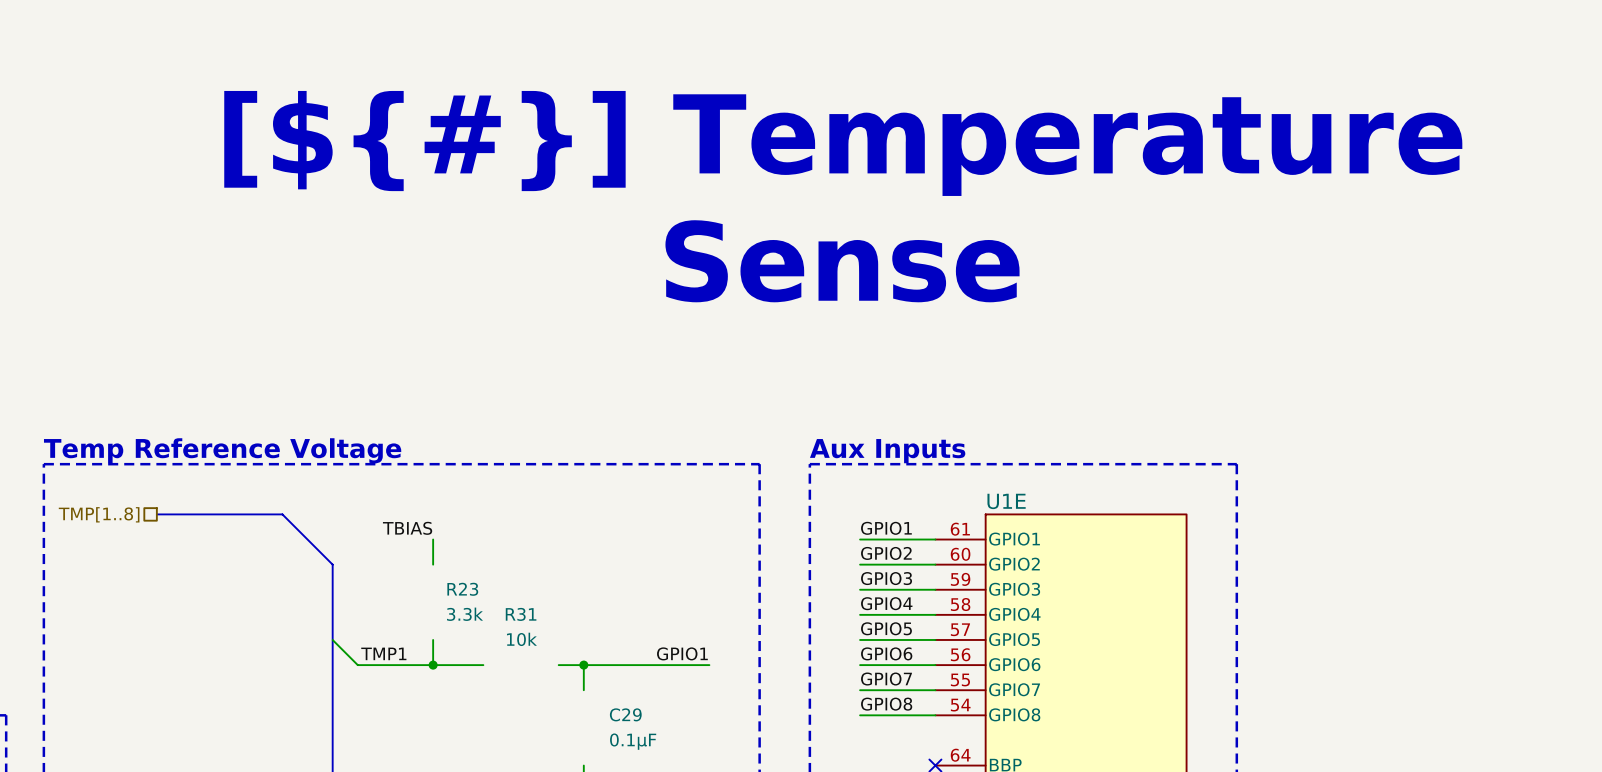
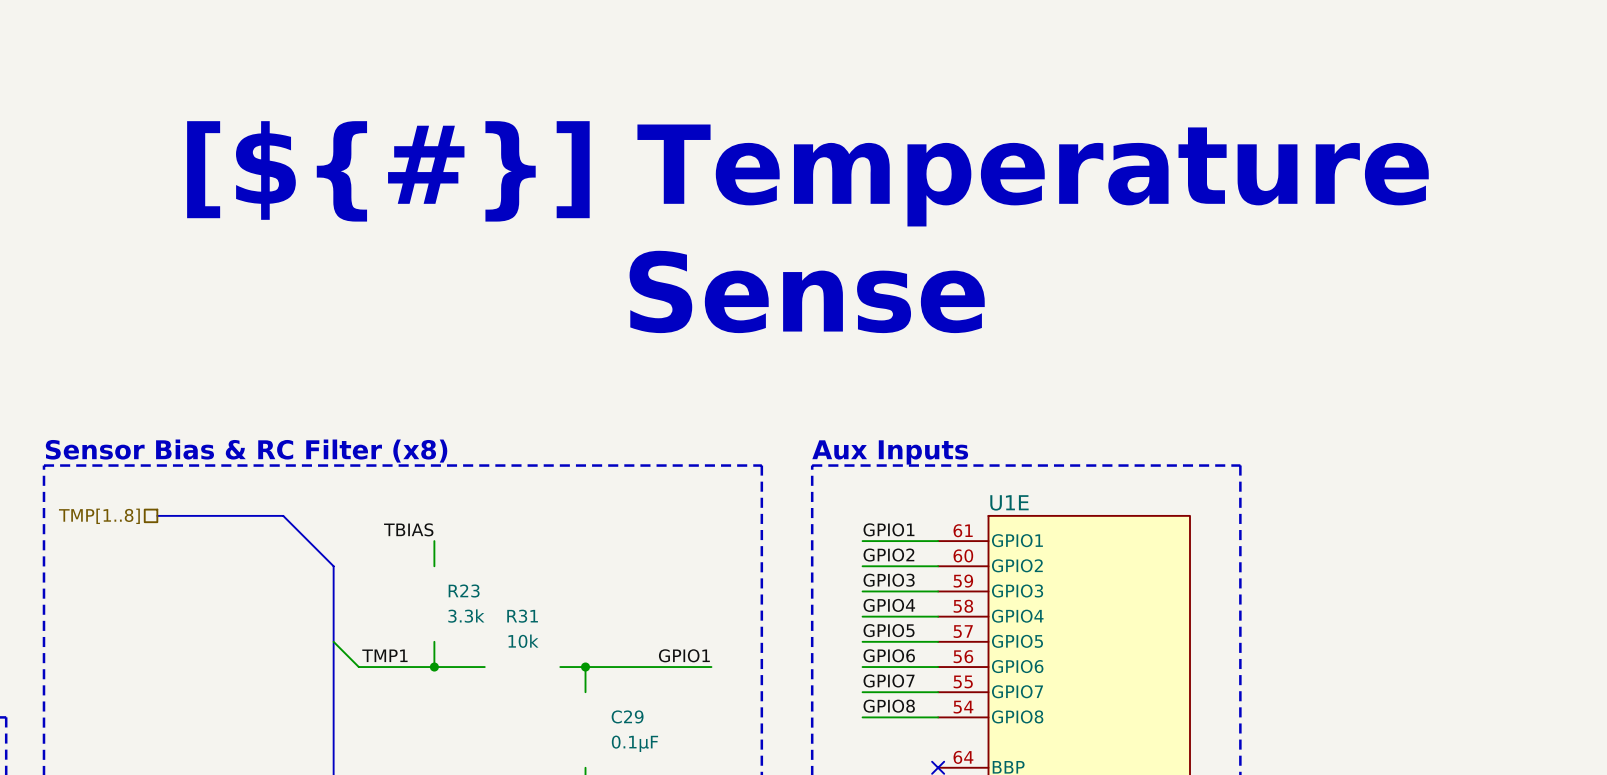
text position: [${#}] Temperature (843, 143) -> [${#}] Temperature (807, 173)
text position: Sense (842, 261) -> Sense (807, 291)
text: Temp Reference Voltage (222, 450) -> Sensor Bias & RC Filter (x8) (246, 451)

